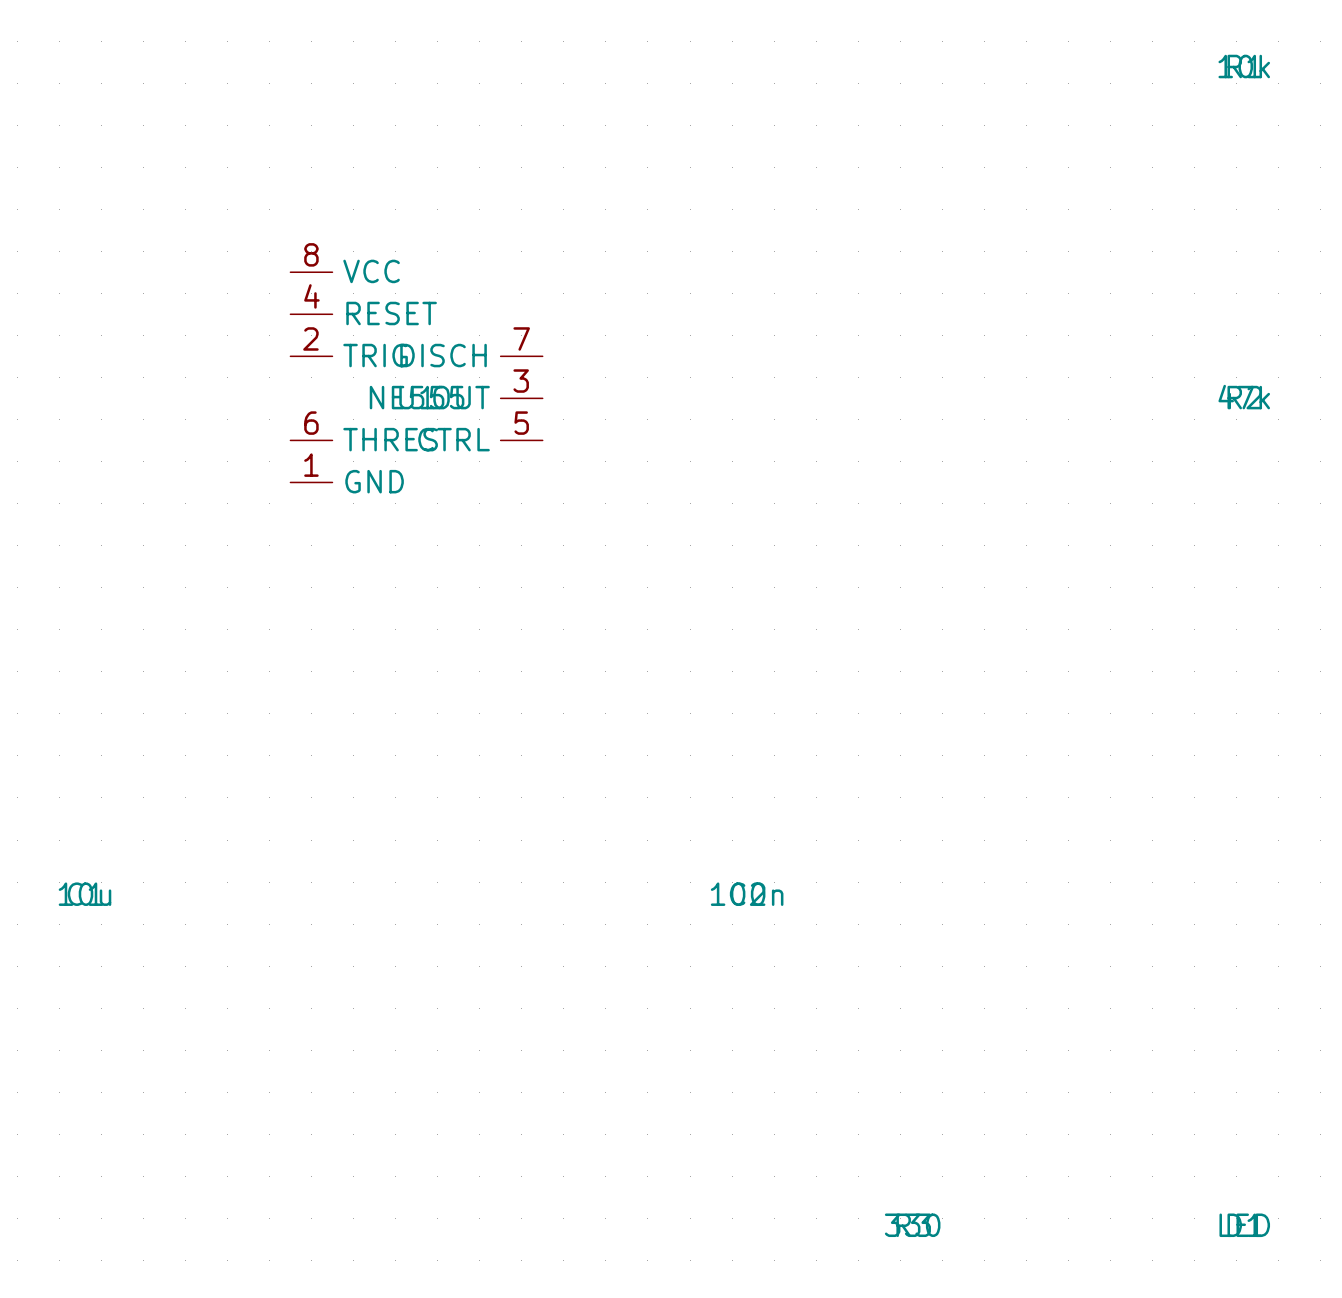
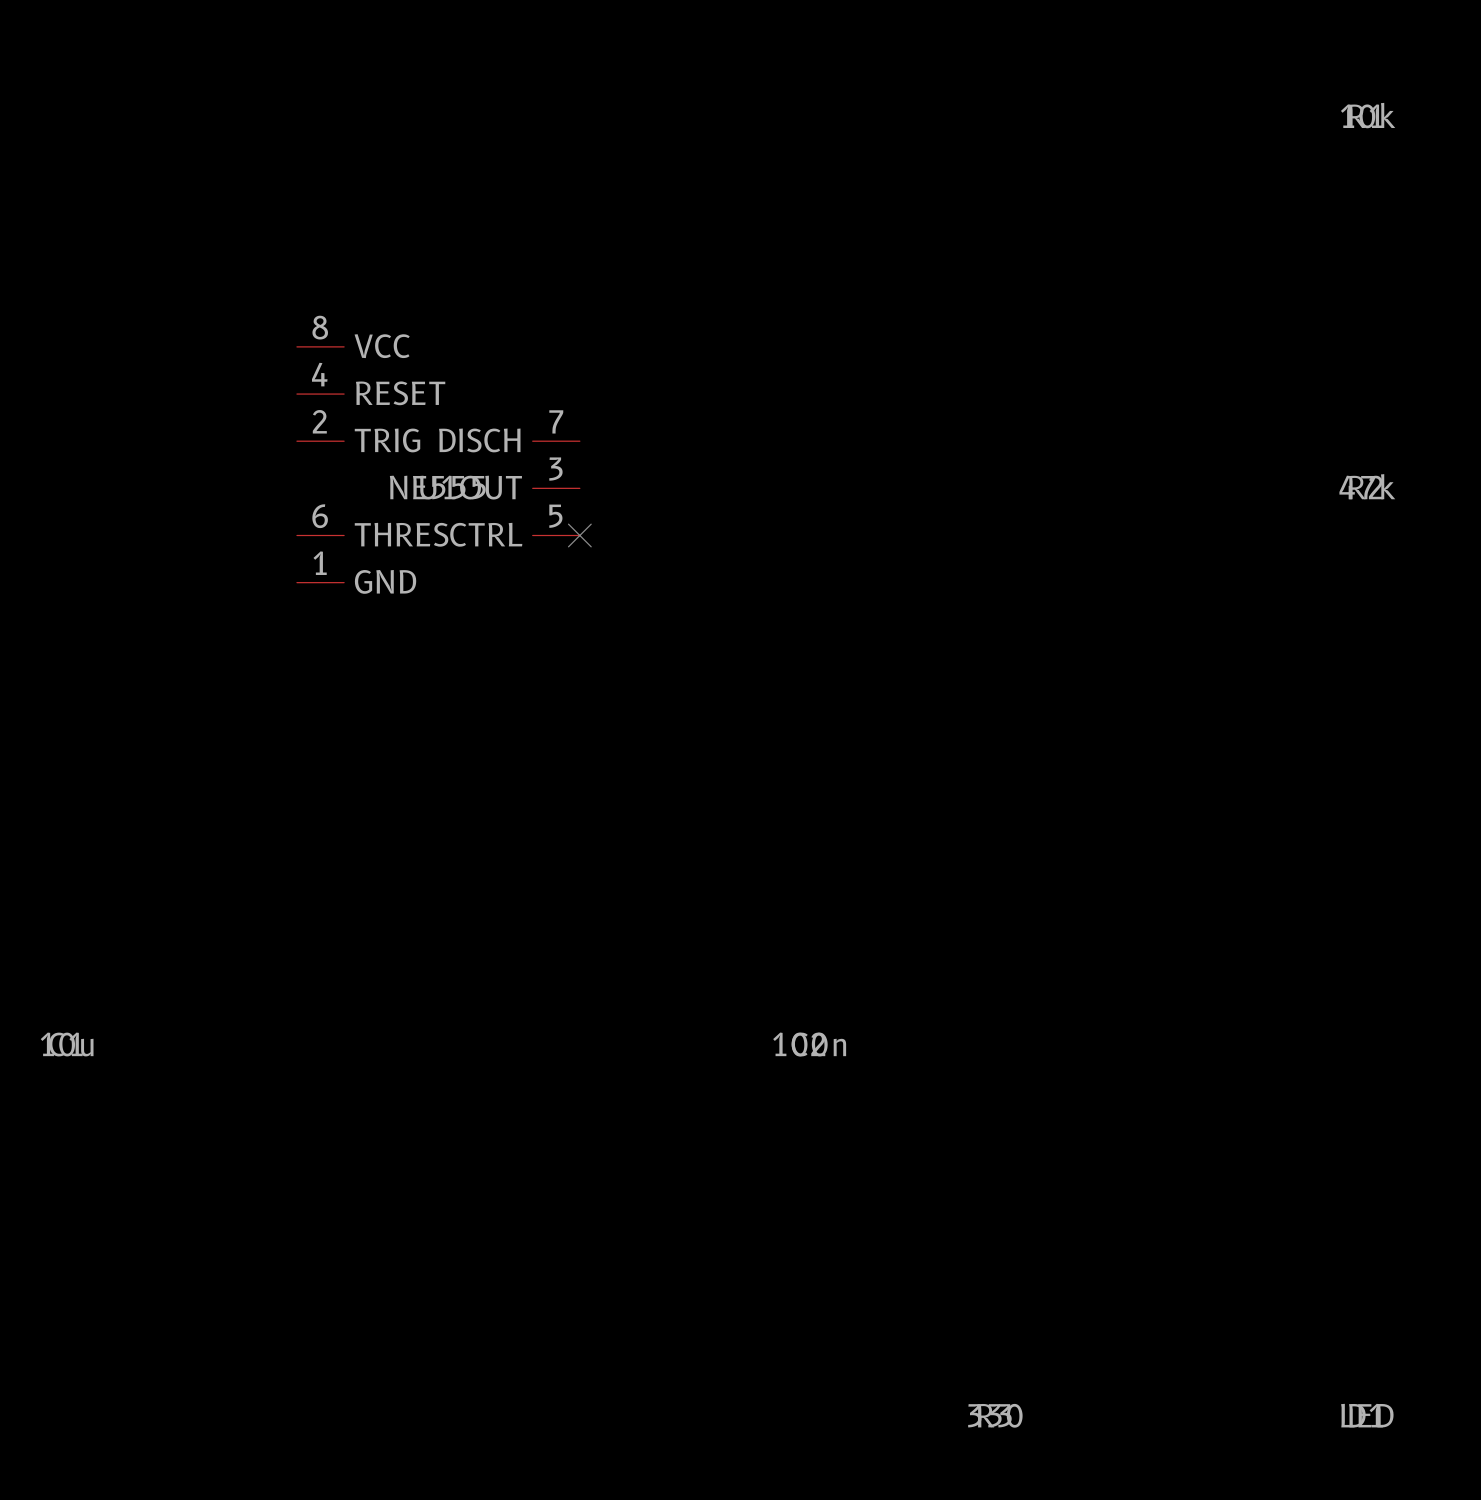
no-connect mark: none -> (579, 535)

